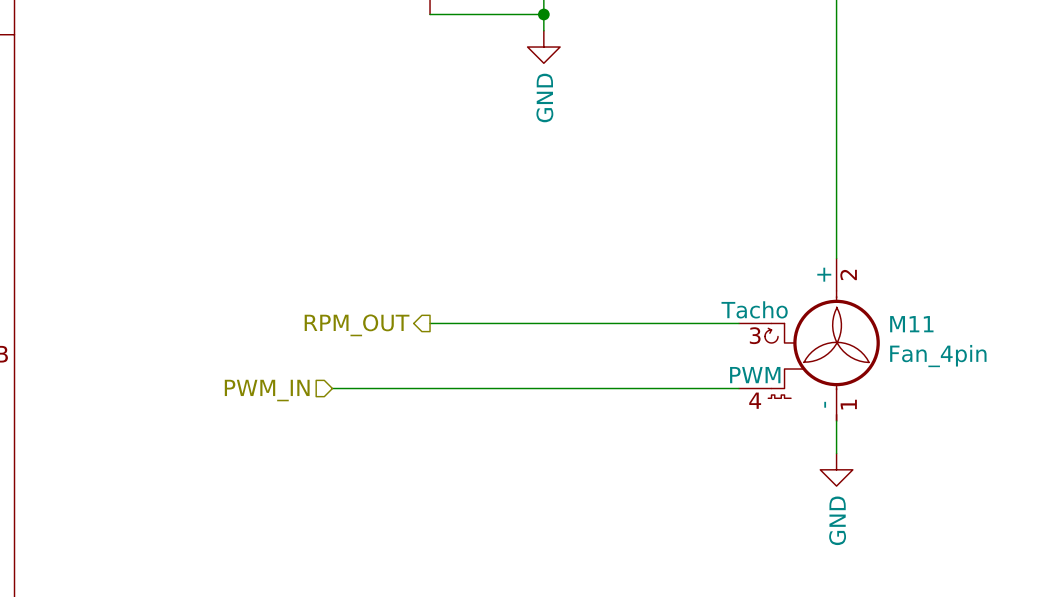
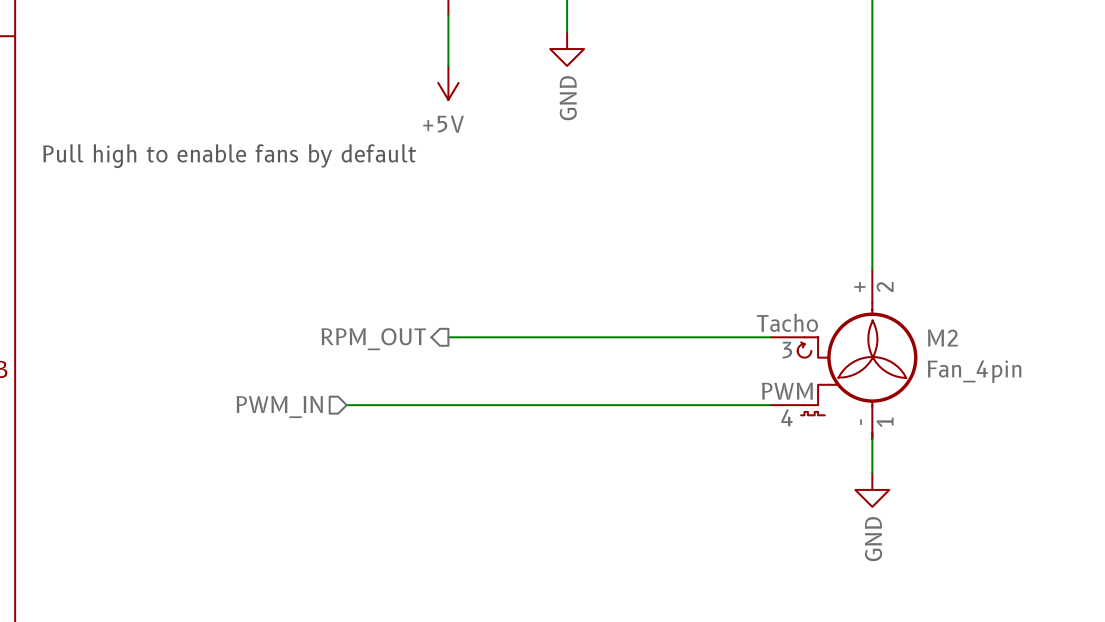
wire: (430, 14) (543, 14) -> (448, 15) (448, 65)
junction: (543, 14) -> none
power symbol: none -> +5V (448, 82)
text: none -> Pull high to enable fans by default (229, 156)
M11 name: M11 (911, 324) -> M2 (942, 338)

